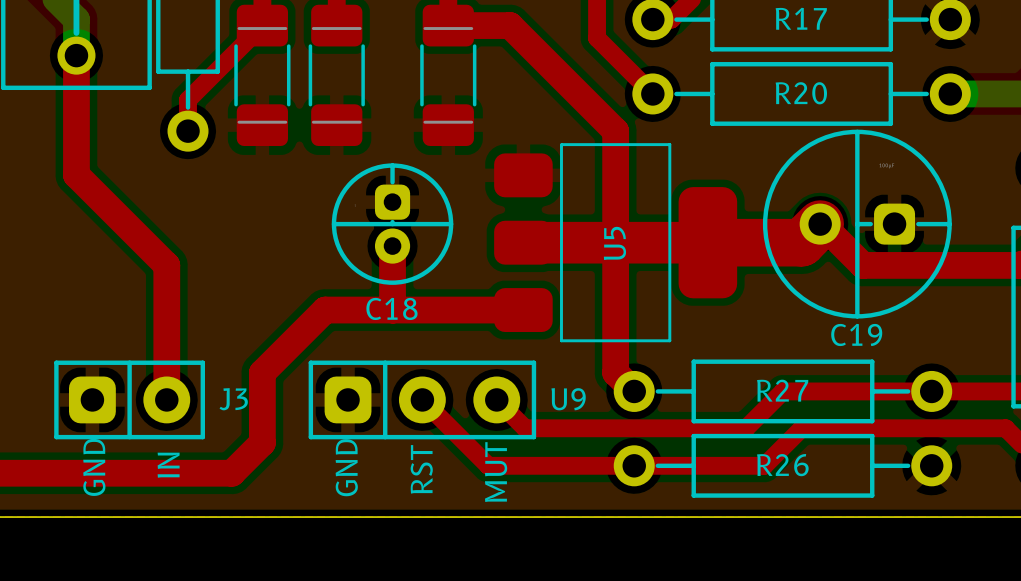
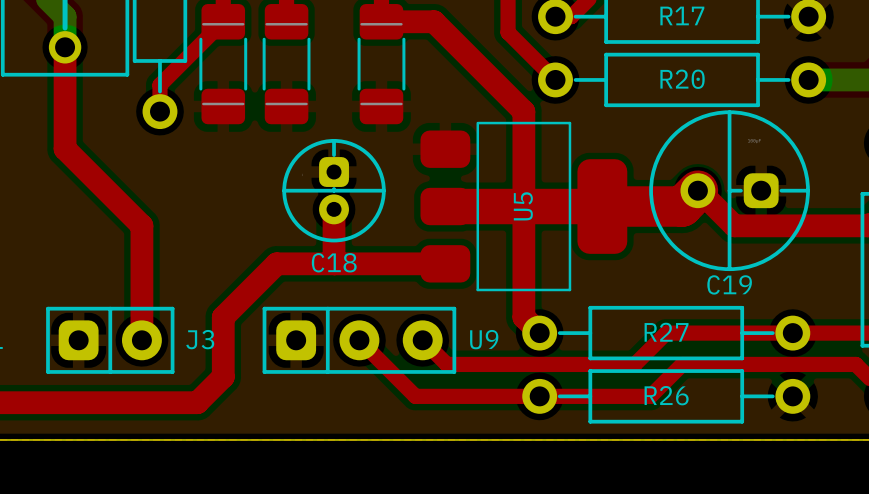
text: IN (168, 465) -> none
text: GND (94, 467) -> none
text: GND (346, 467) -> none
text: RST (421, 469) -> none
text: MUT (496, 472) -> none

